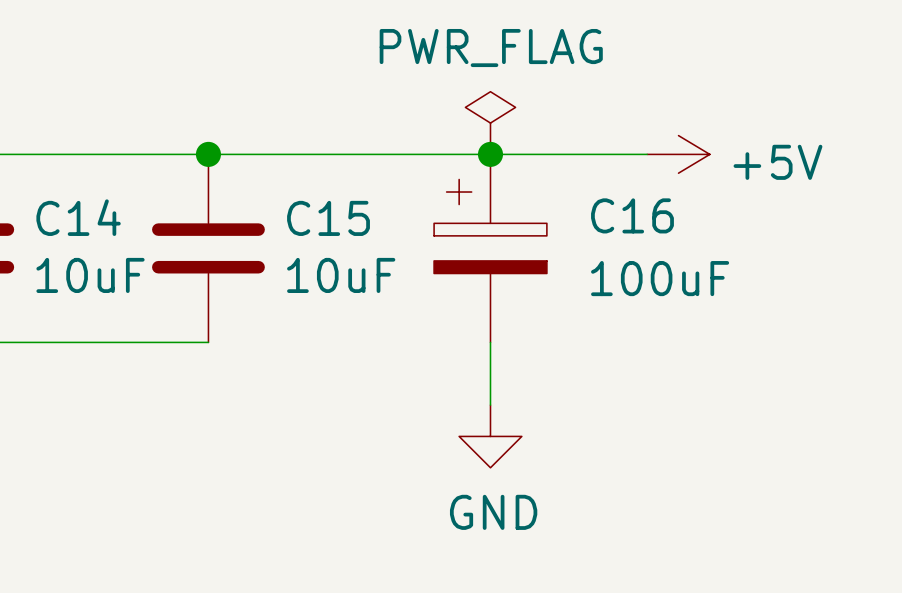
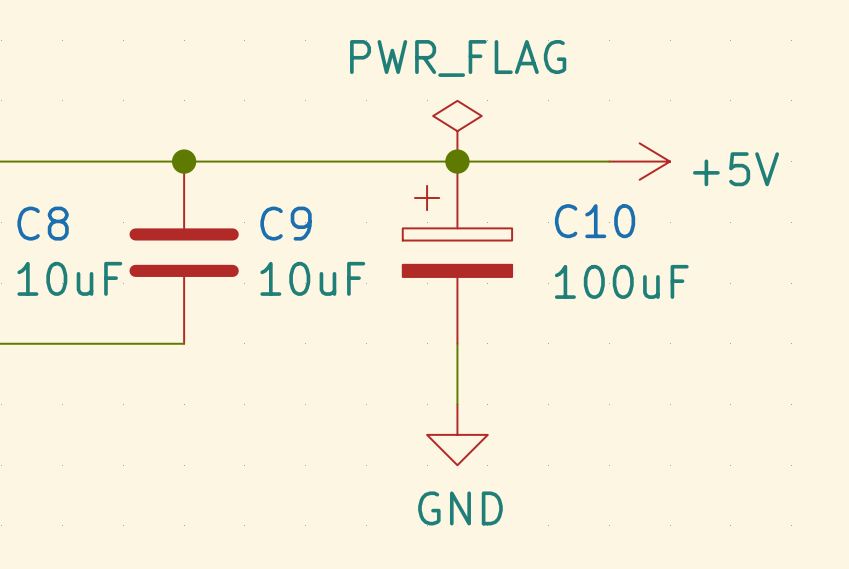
C16 name: C16 (632, 215) -> C10 (595, 221)
C14 name: C14 (78, 217) -> C8 (43, 223)
C15 name: C15 (328, 218) -> C9 (286, 223)

